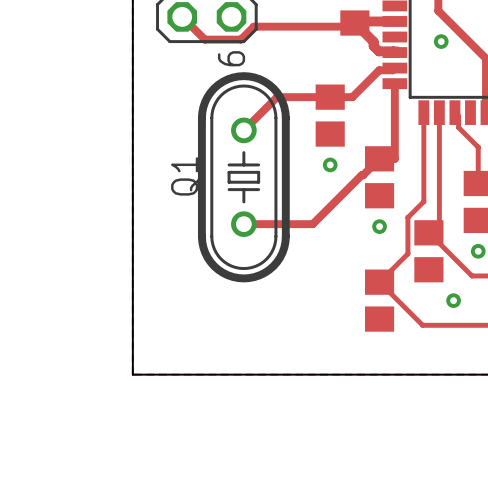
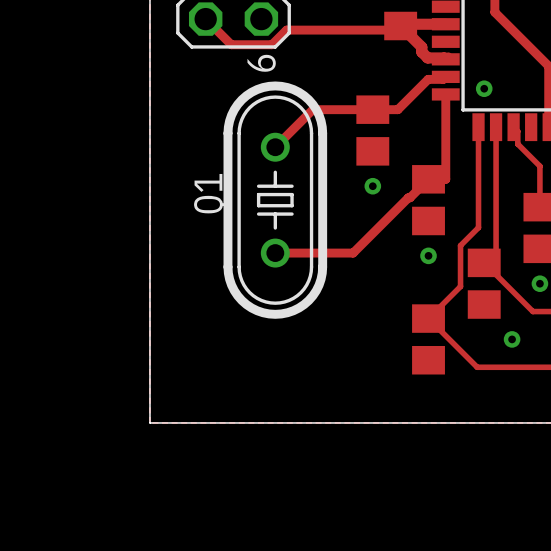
via position: (441, 41) -> (484, 88)

